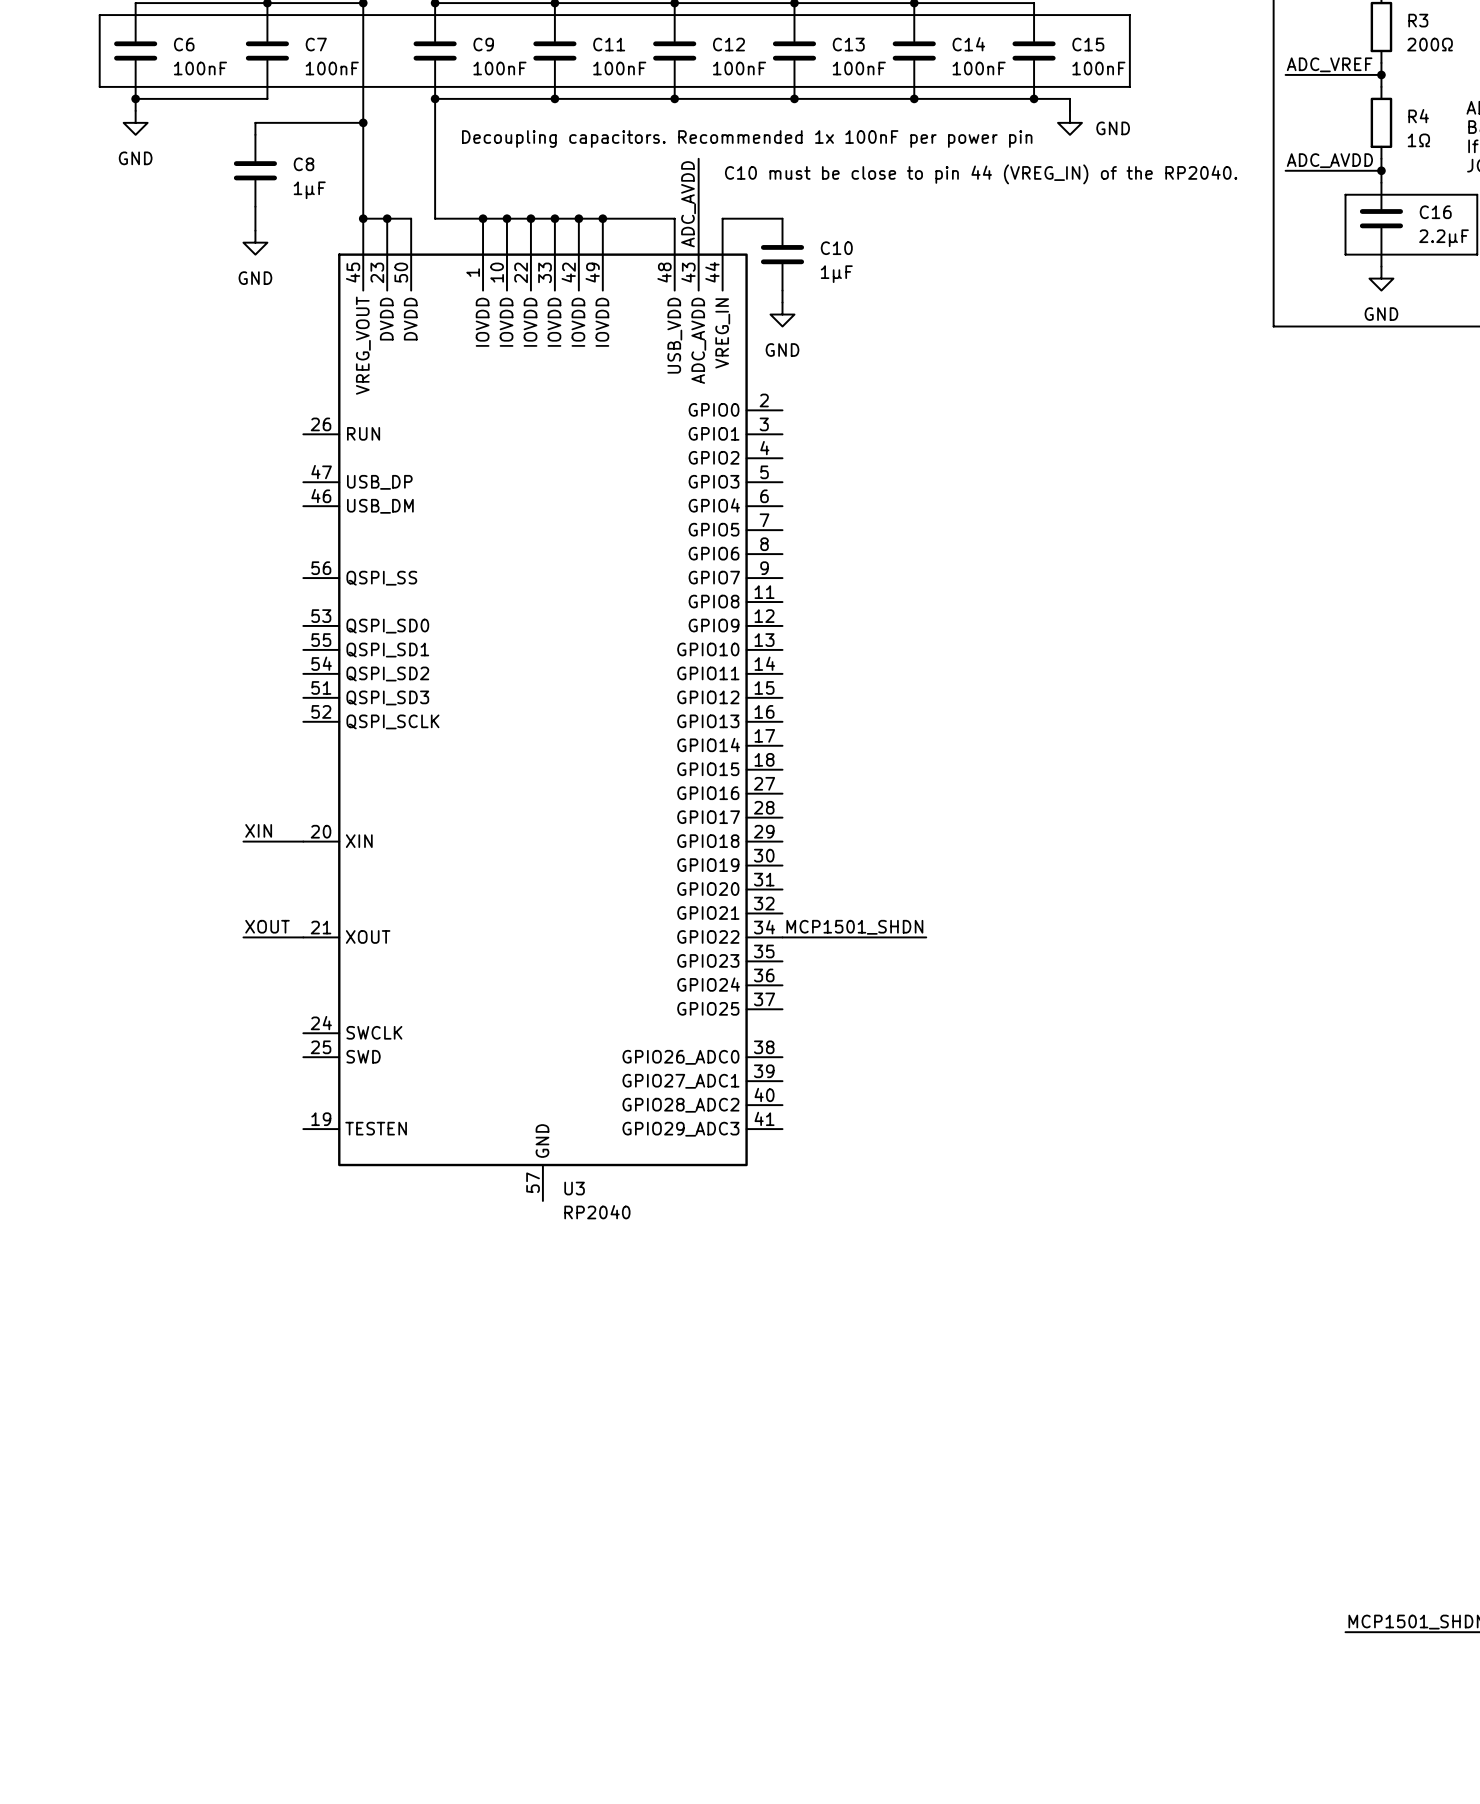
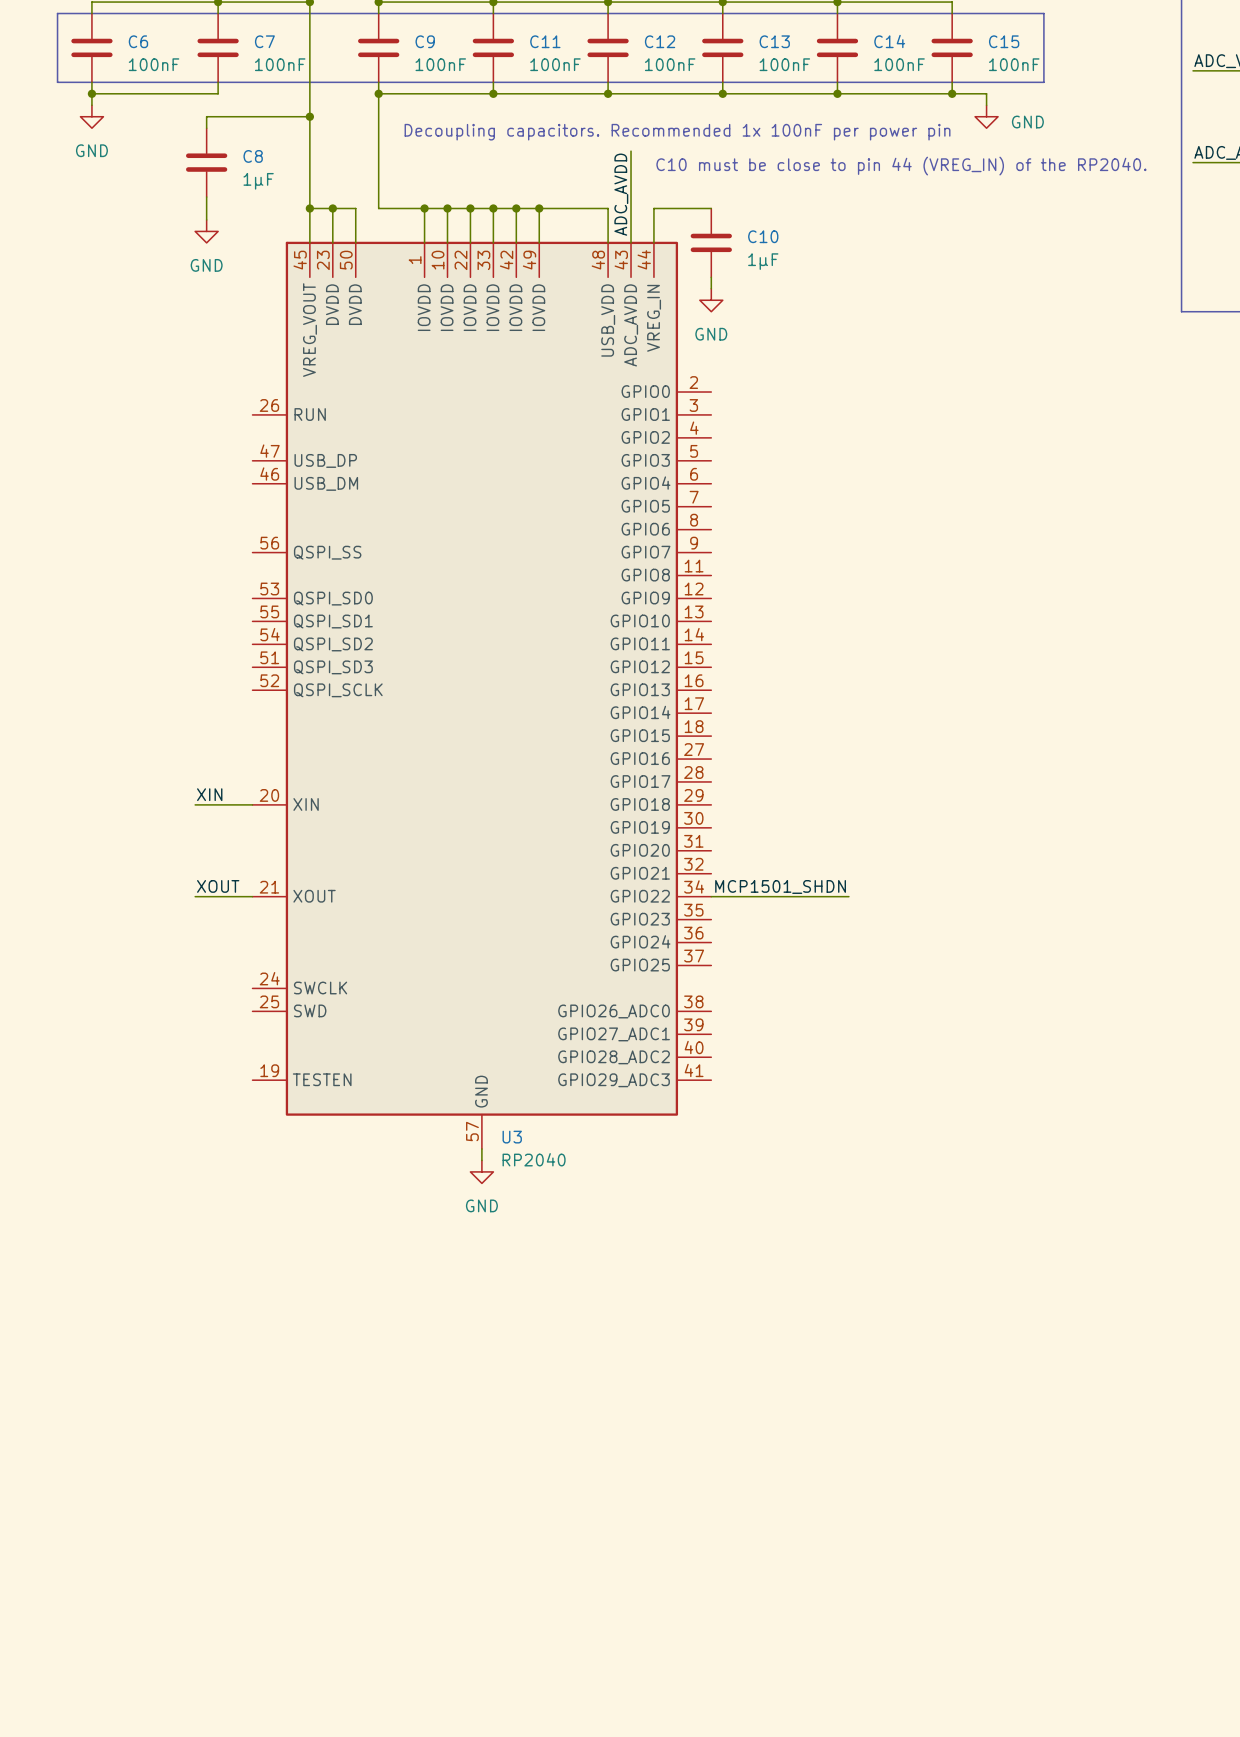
wire: none -> (481, 1148) (481, 1160)
power symbol: none -> GND (481, 1171)

